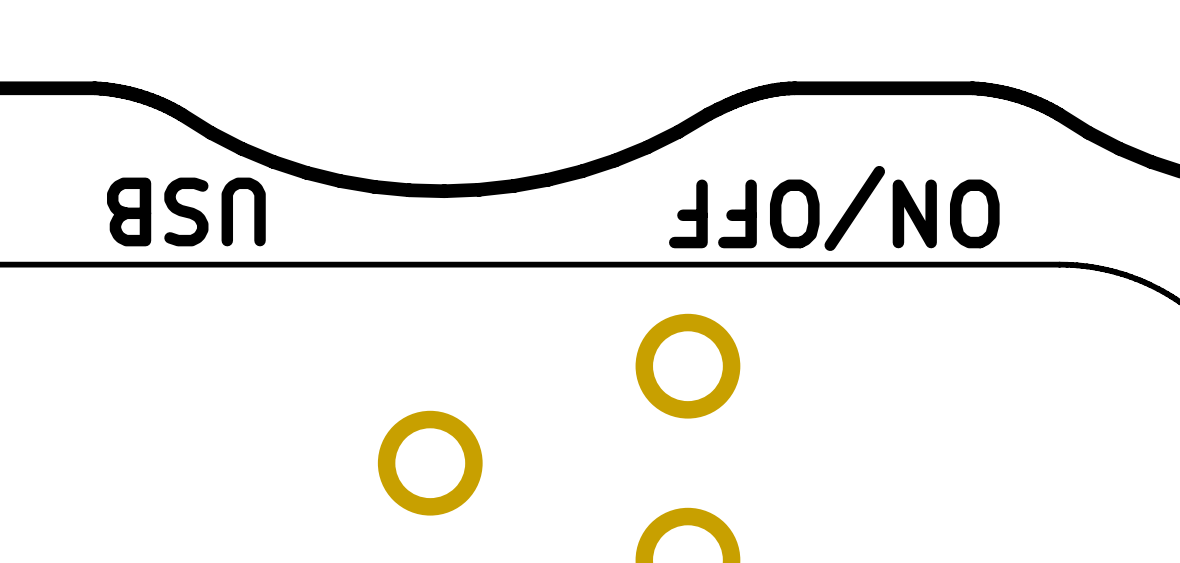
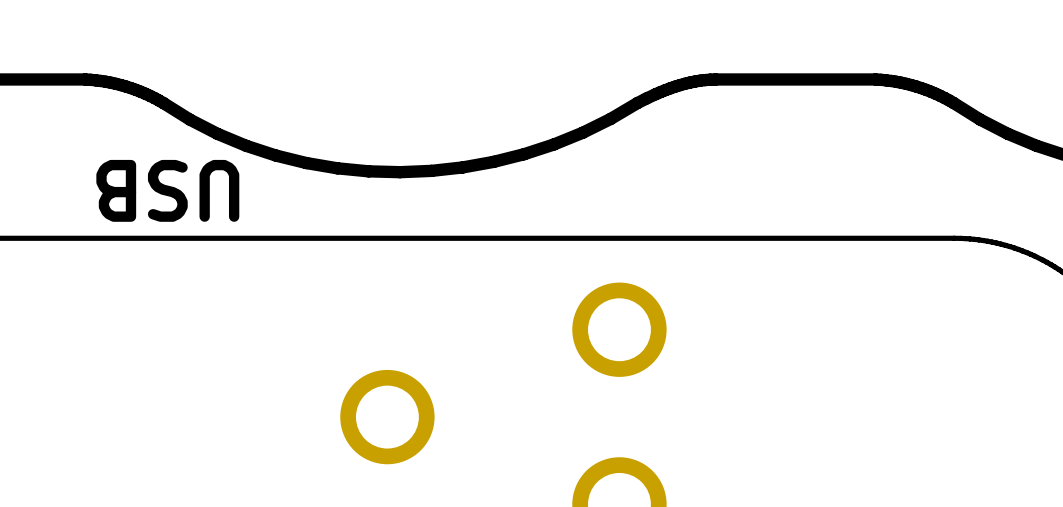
text: ON/OFF (834, 208) -> none

